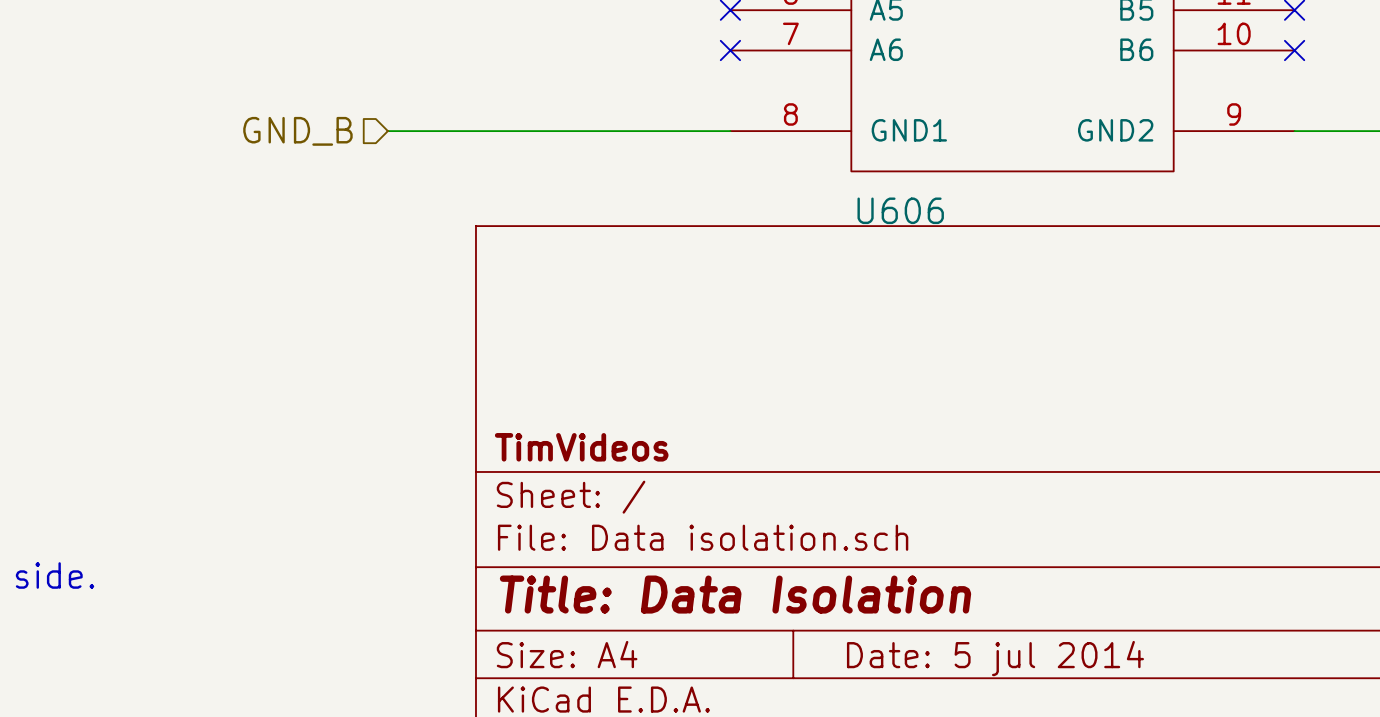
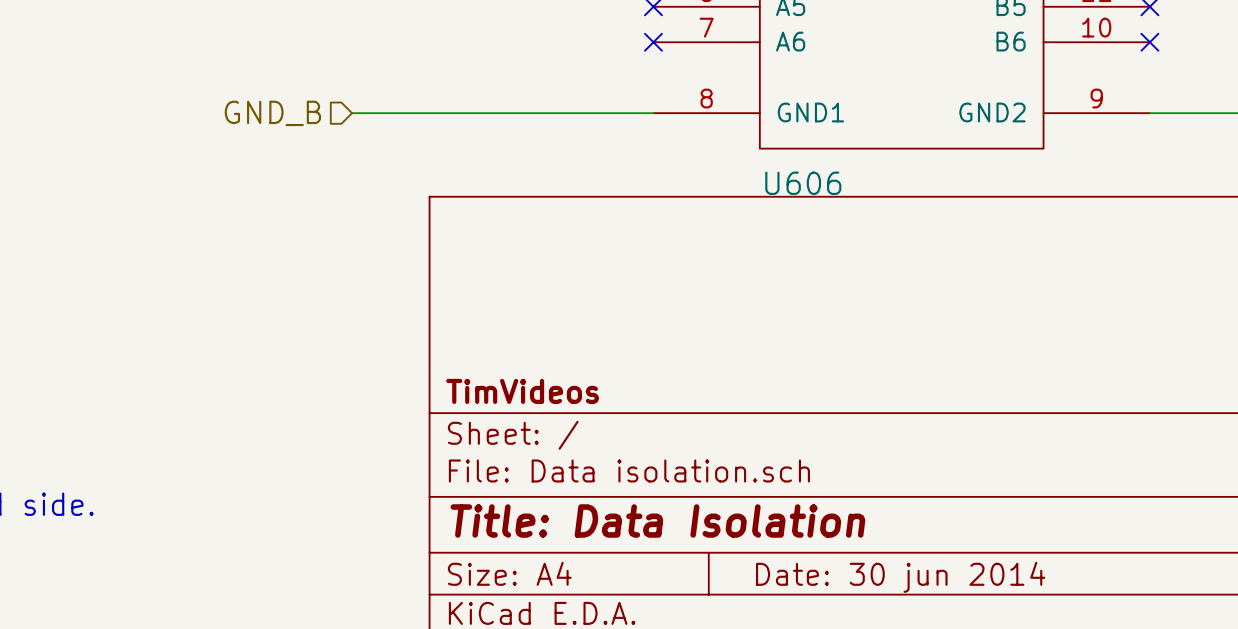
title block: Date: 5 jul 2014 (995, 658) -> Date: 30 jun 2014 (900, 577)

